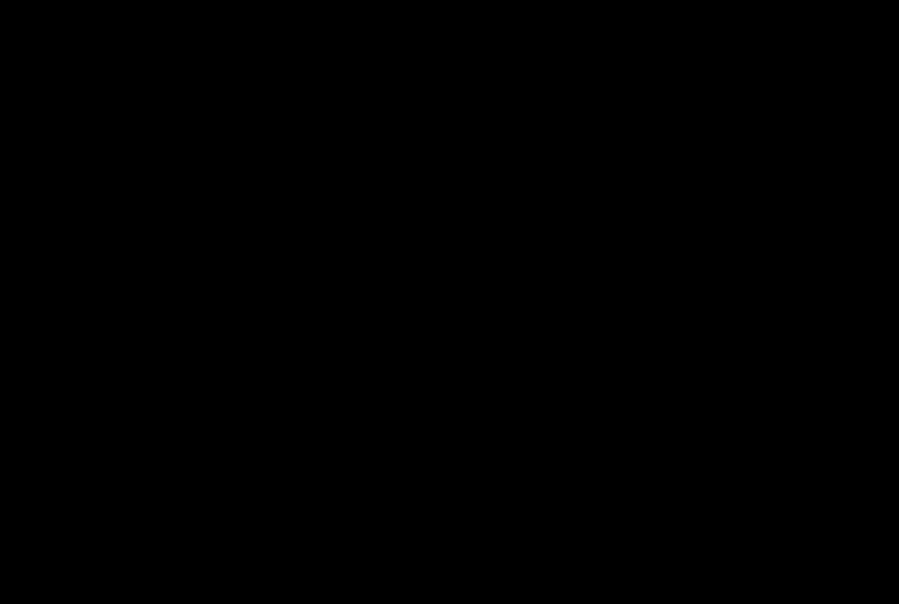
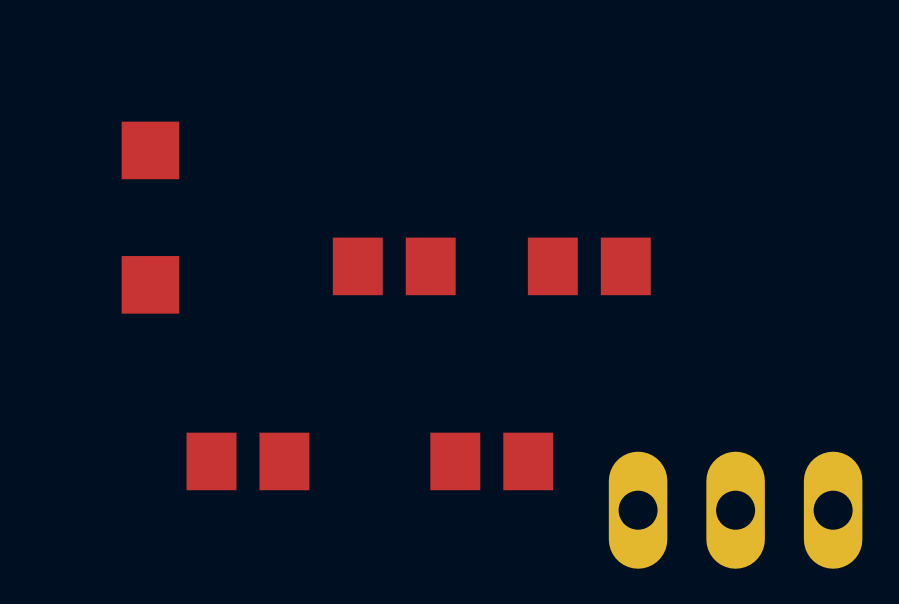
part: none -> (150, 217)
part: none -> (394, 266)
part: none -> (589, 266)
part: none -> (247, 461)
part: none -> (491, 461)
part: none -> (735, 510)

